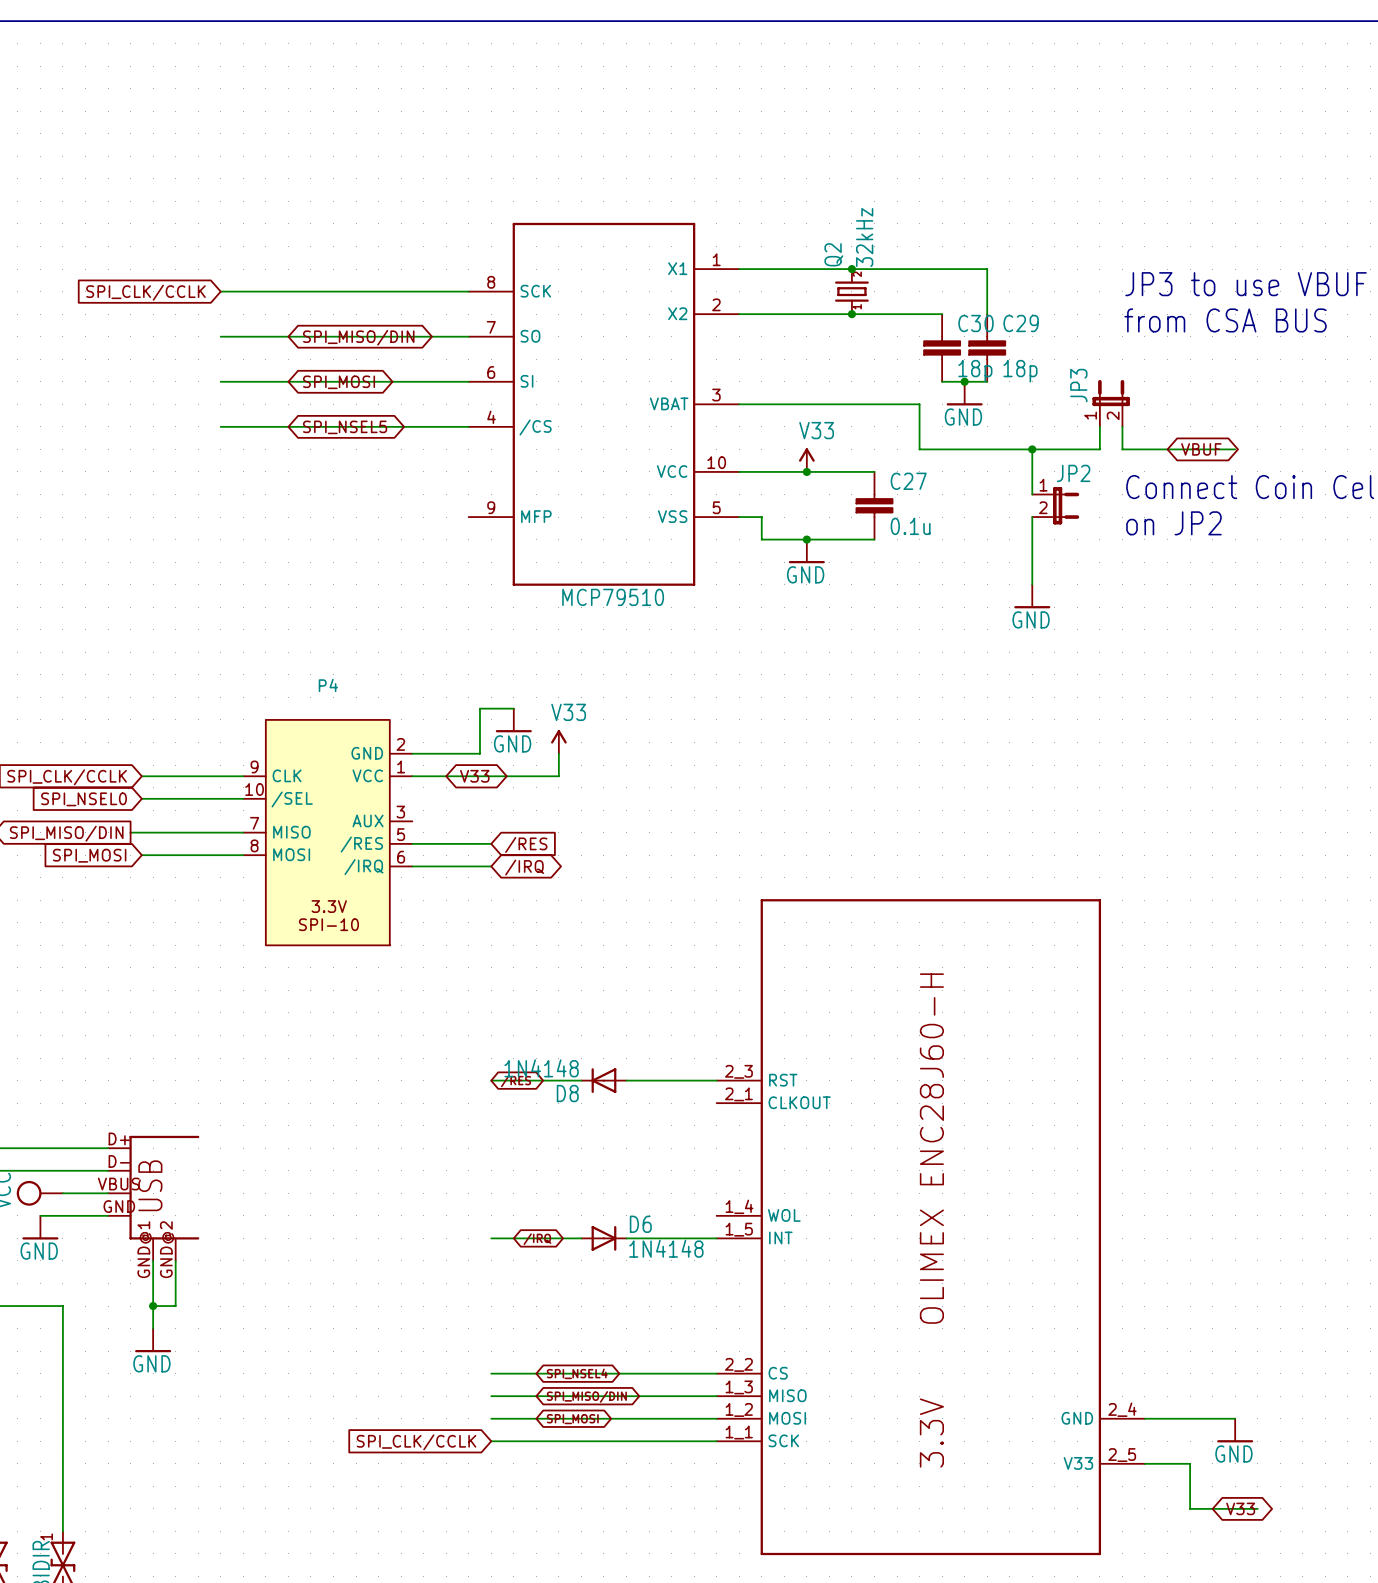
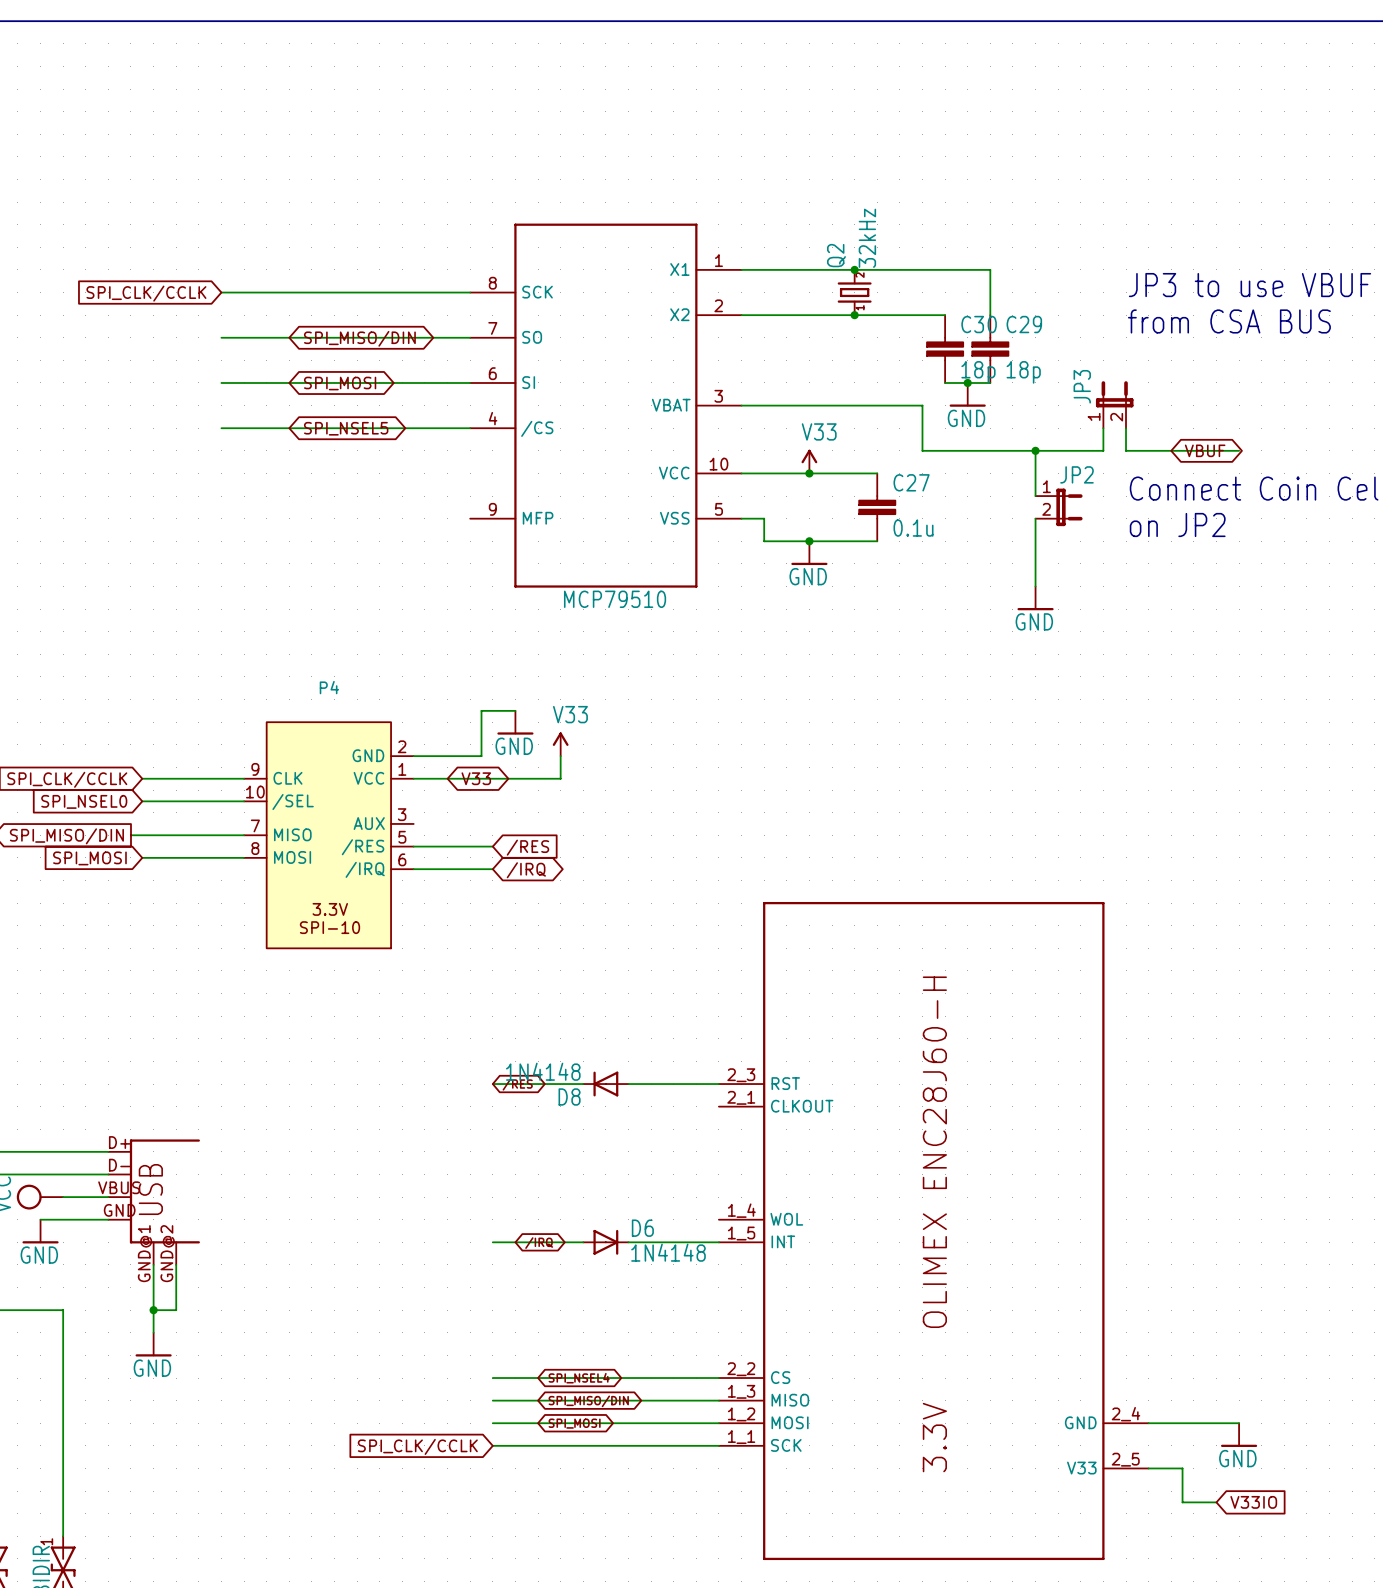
wire: (1178, 1463) (1190, 1463) (1190, 1508) (1257, 1508) -> (1182, 1468) (1182, 1502) (1216, 1502)
global label shape: bidirectional (1240, 1508) -> input (1253, 1502)
global label: V33 (1240, 1508) -> V33IO (1253, 1502)

